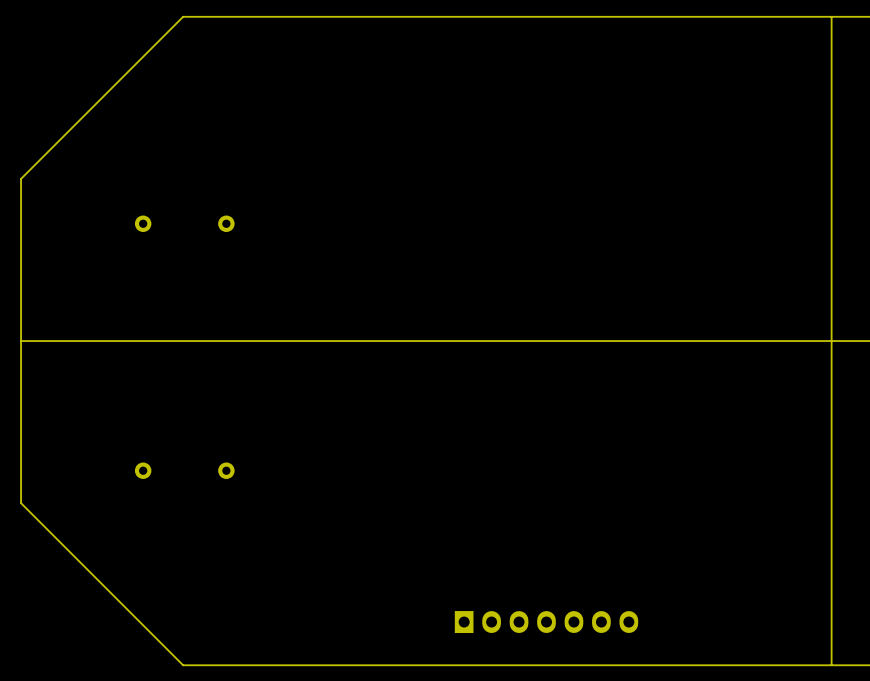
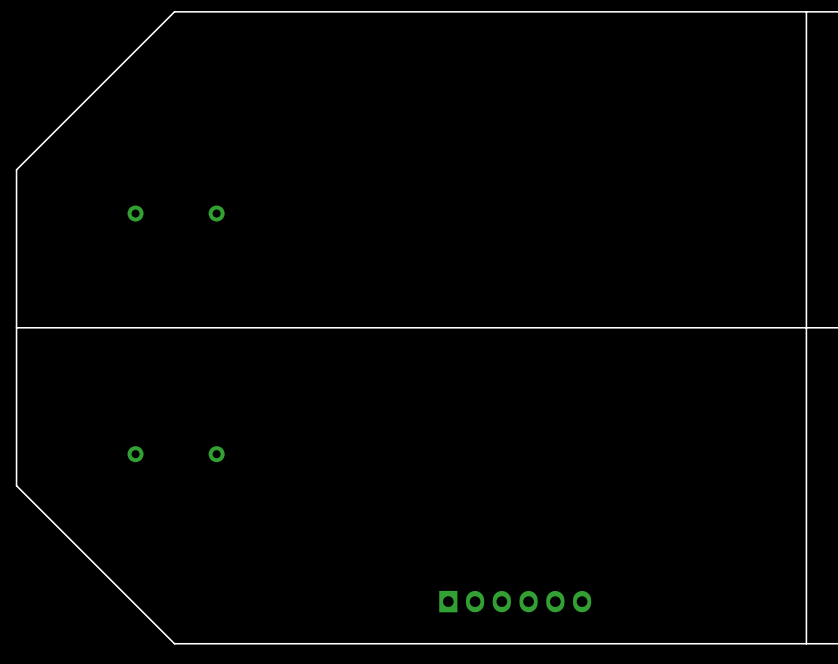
part: (546, 622) -> none

